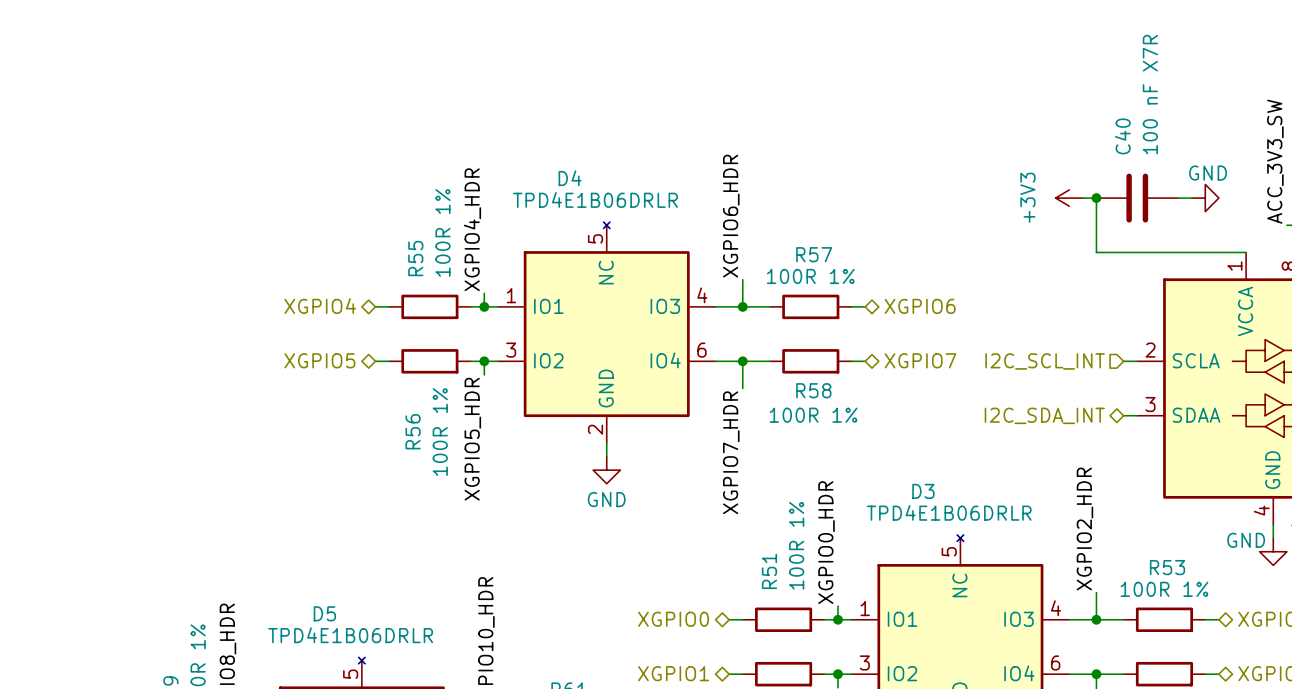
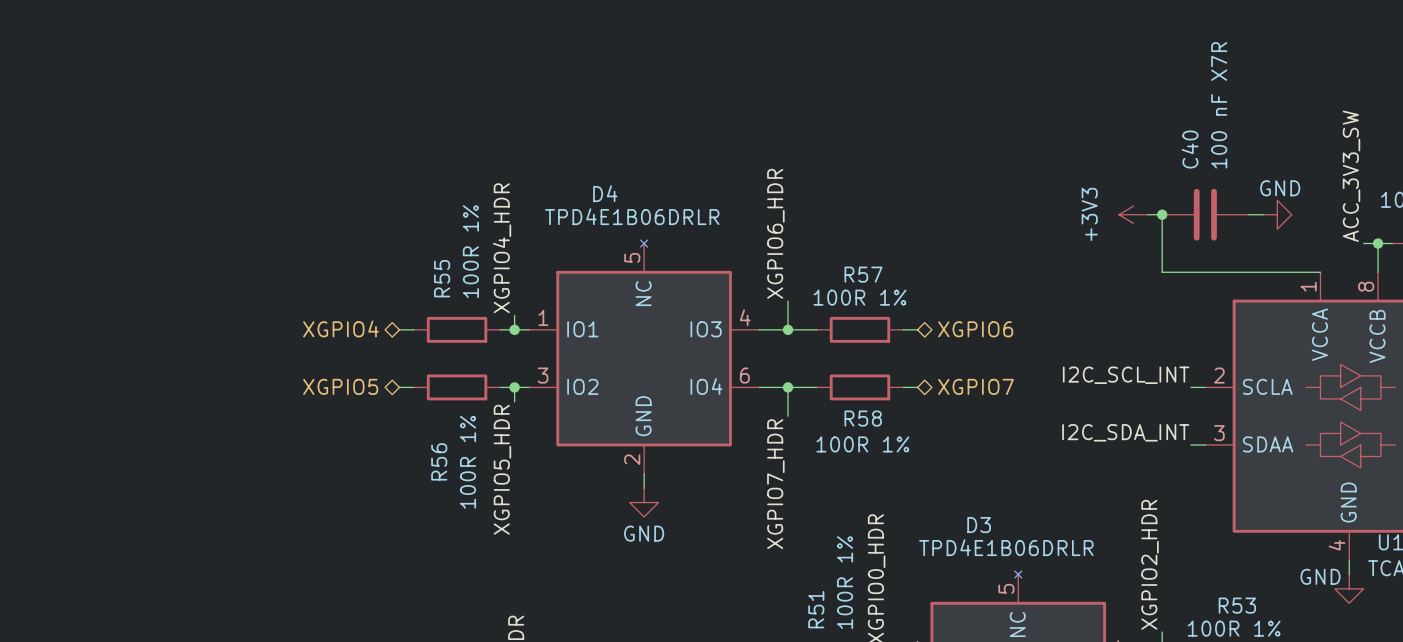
label: none -> I2C_SCL_INT (1126, 375)
hierarchical label: I2C_SCL_INT (1045, 361) -> none
label: none -> I2C_SDA_INT (1125, 432)
hierarchical label: I2C_SDA_INT (1044, 415) -> none

